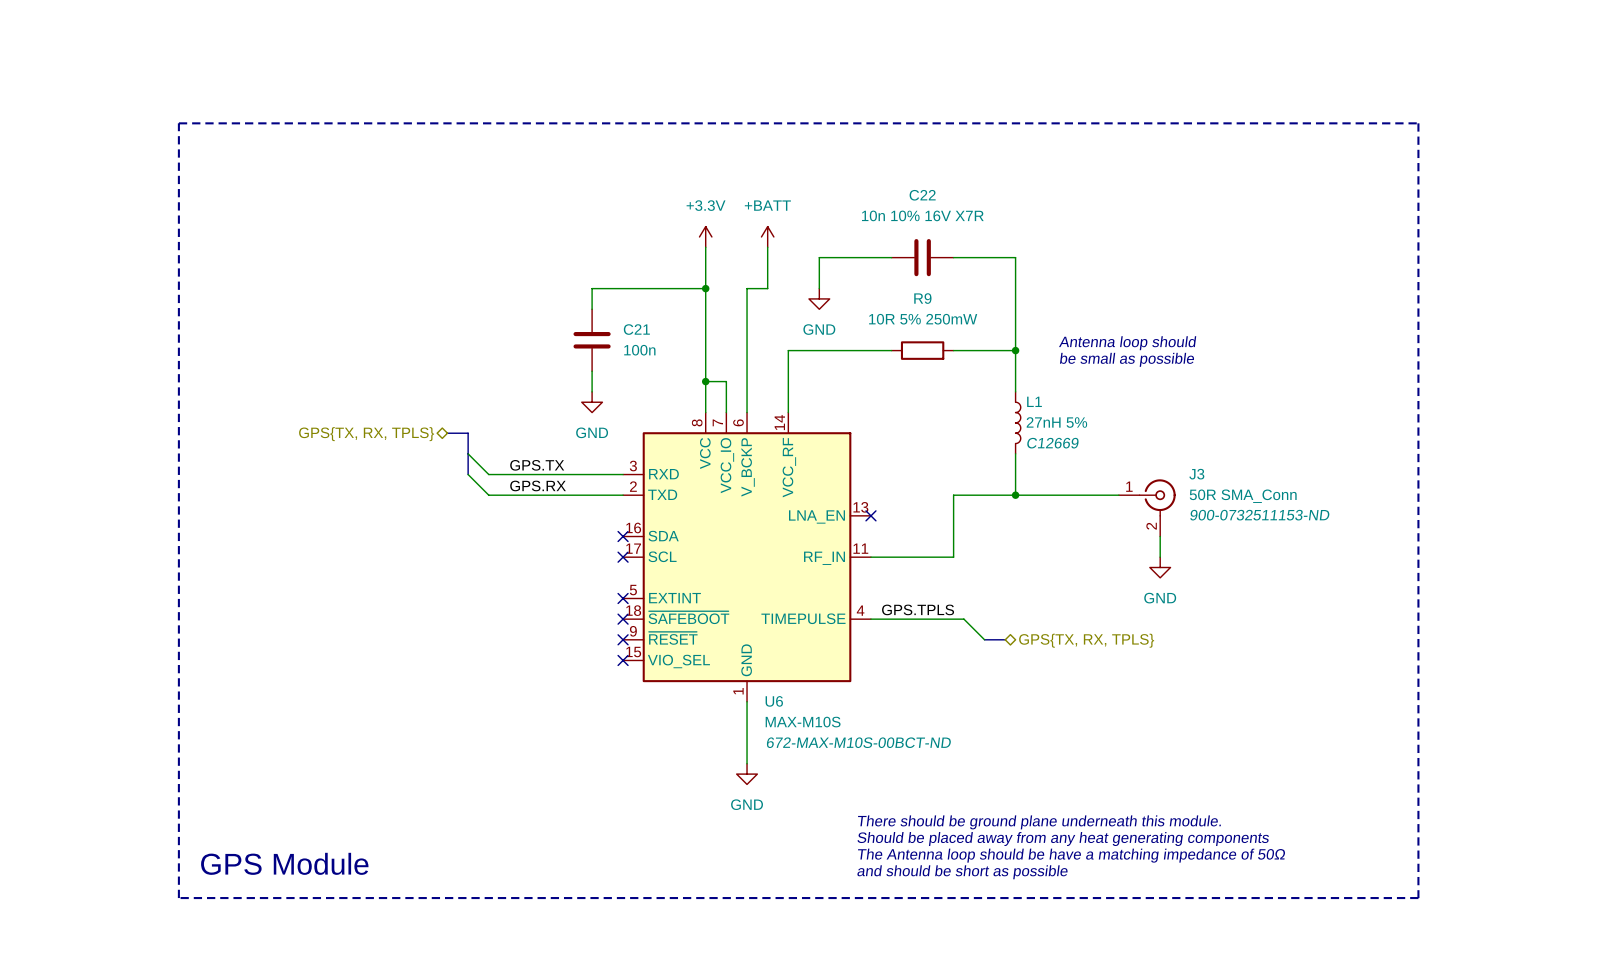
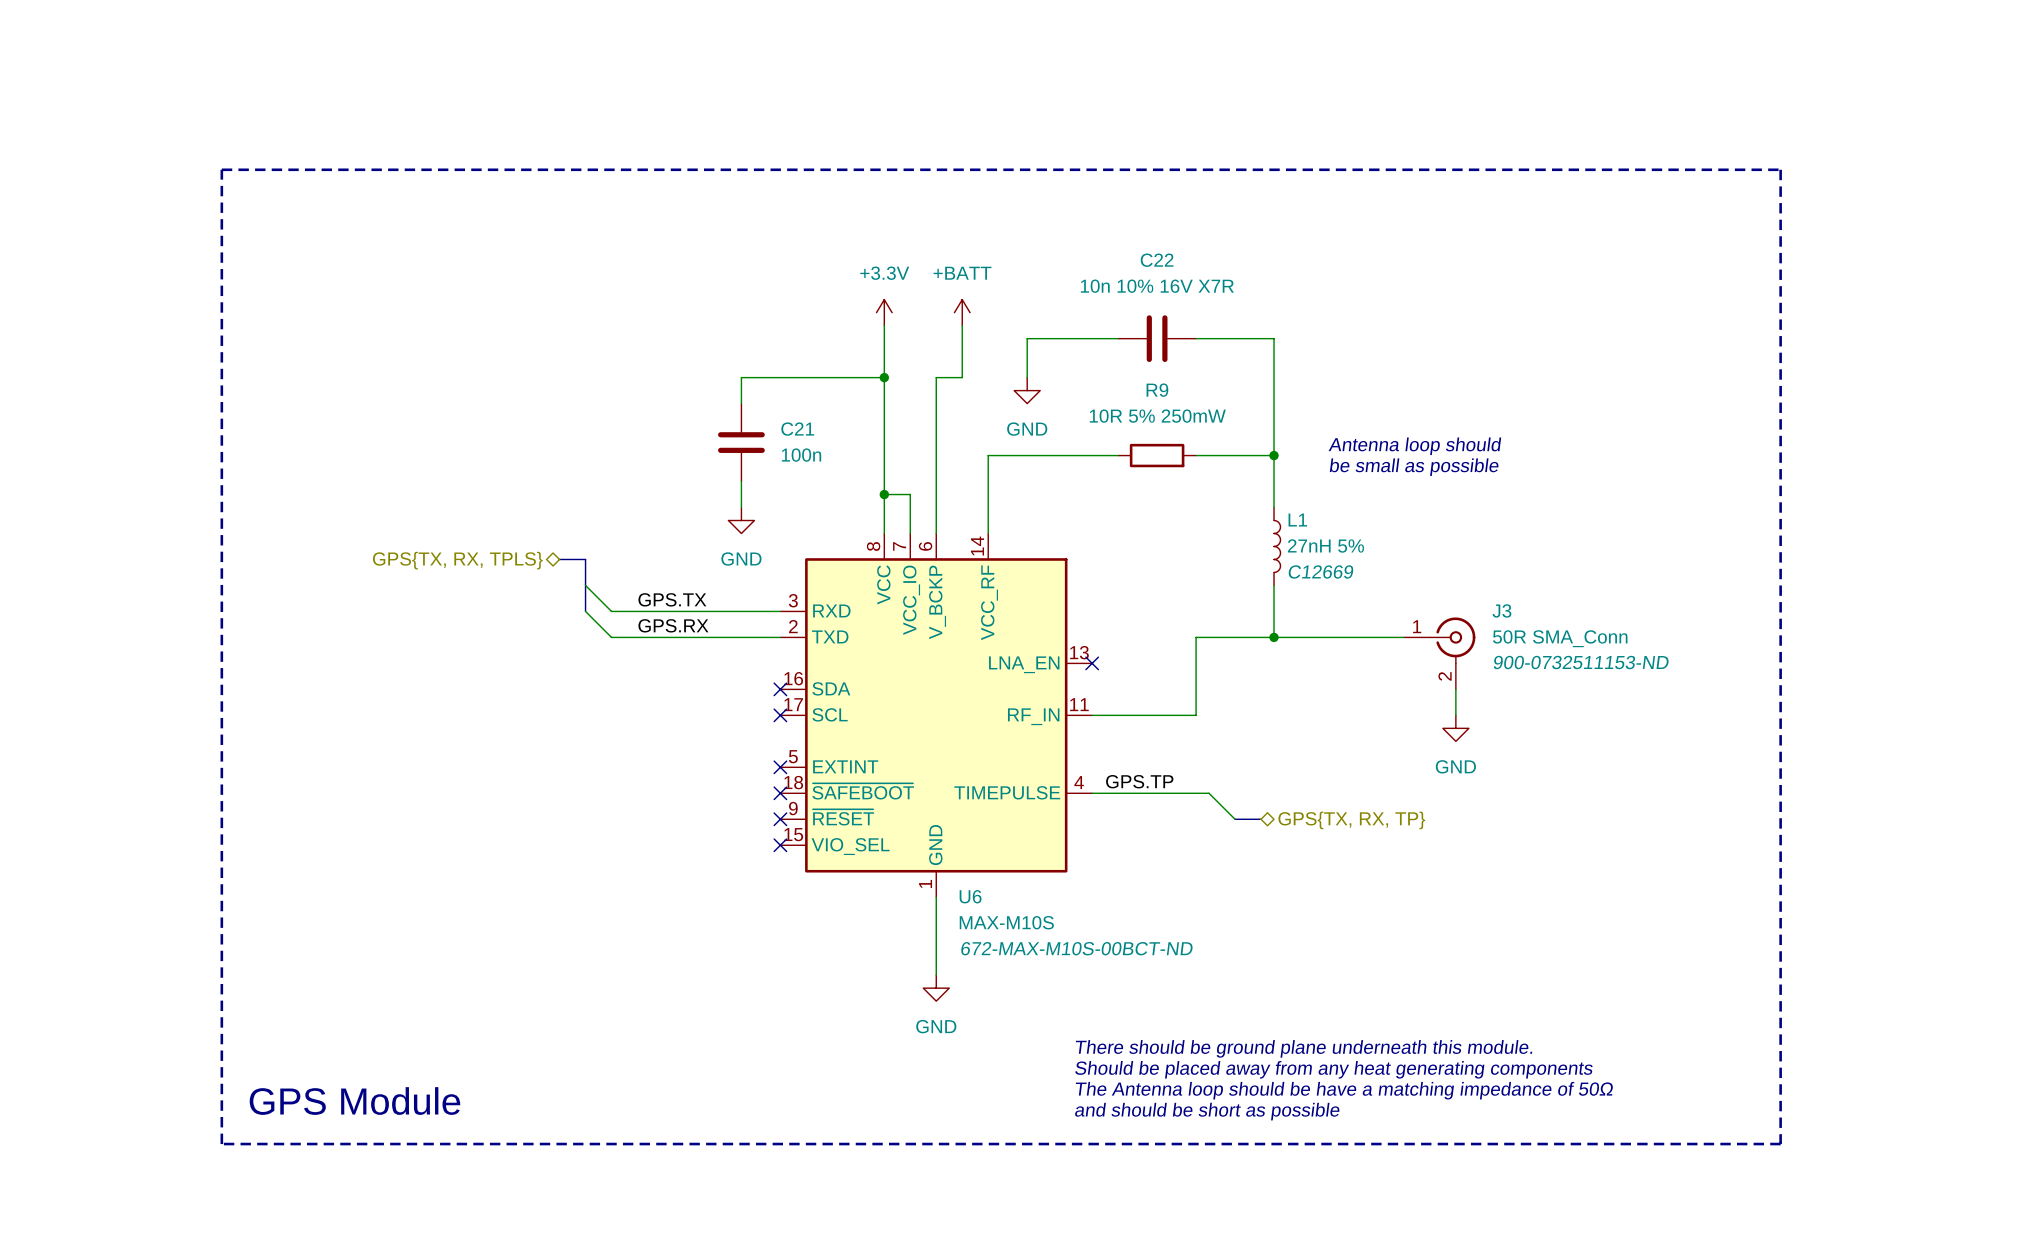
label: GPS.TPLS (918, 609) -> GPS.TP (1139, 781)
hierarchical label: GPS{TX, RX, TPLS} (1086, 640) -> GPS{TX, RX, TP} (1351, 820)

